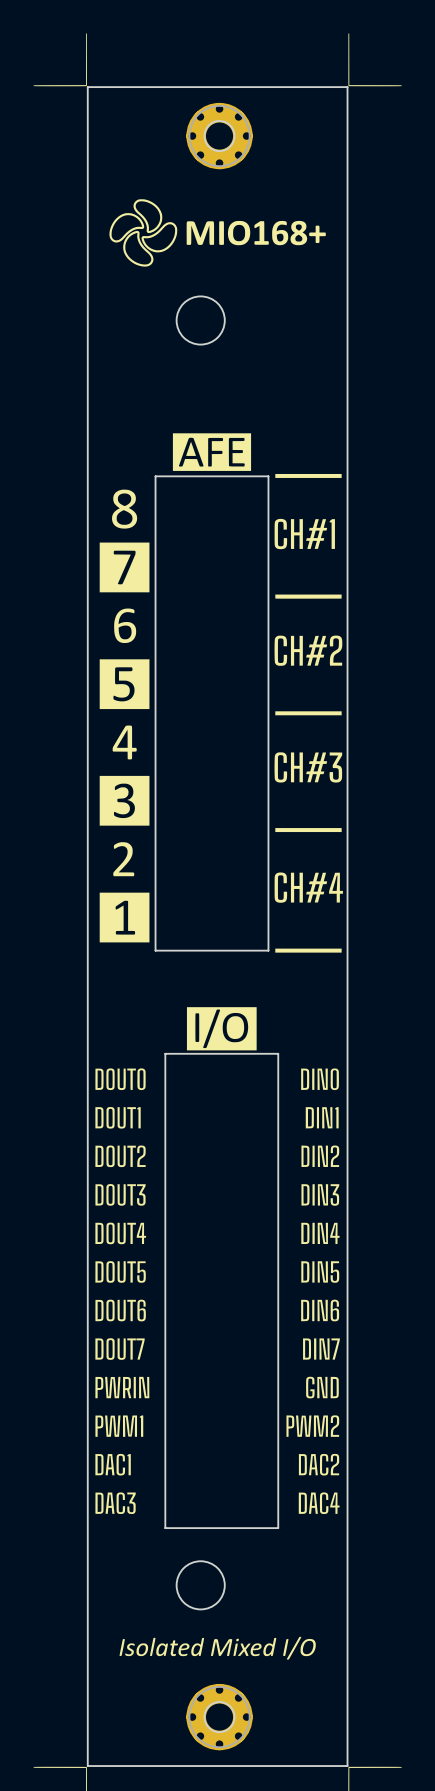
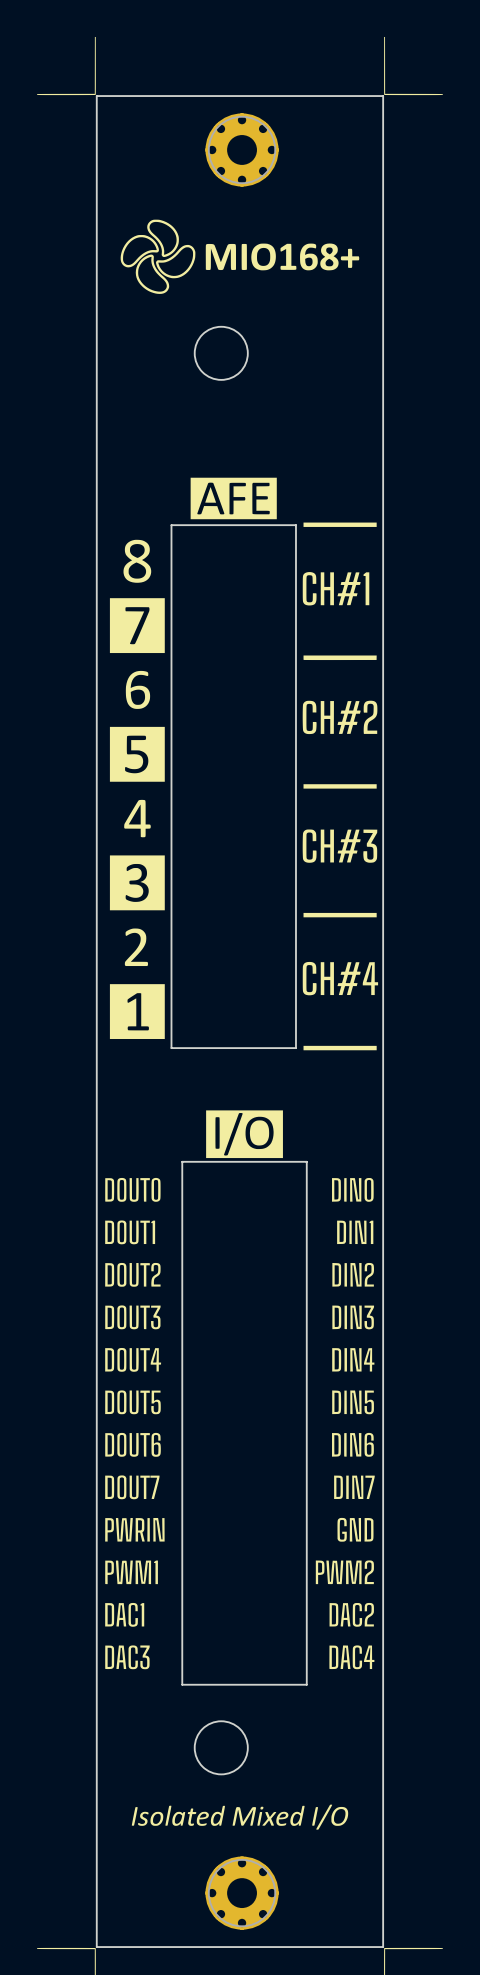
round board edge: [204, 120, 235, 152] -> none
round board edge: [204, 1701, 235, 1733] -> none

